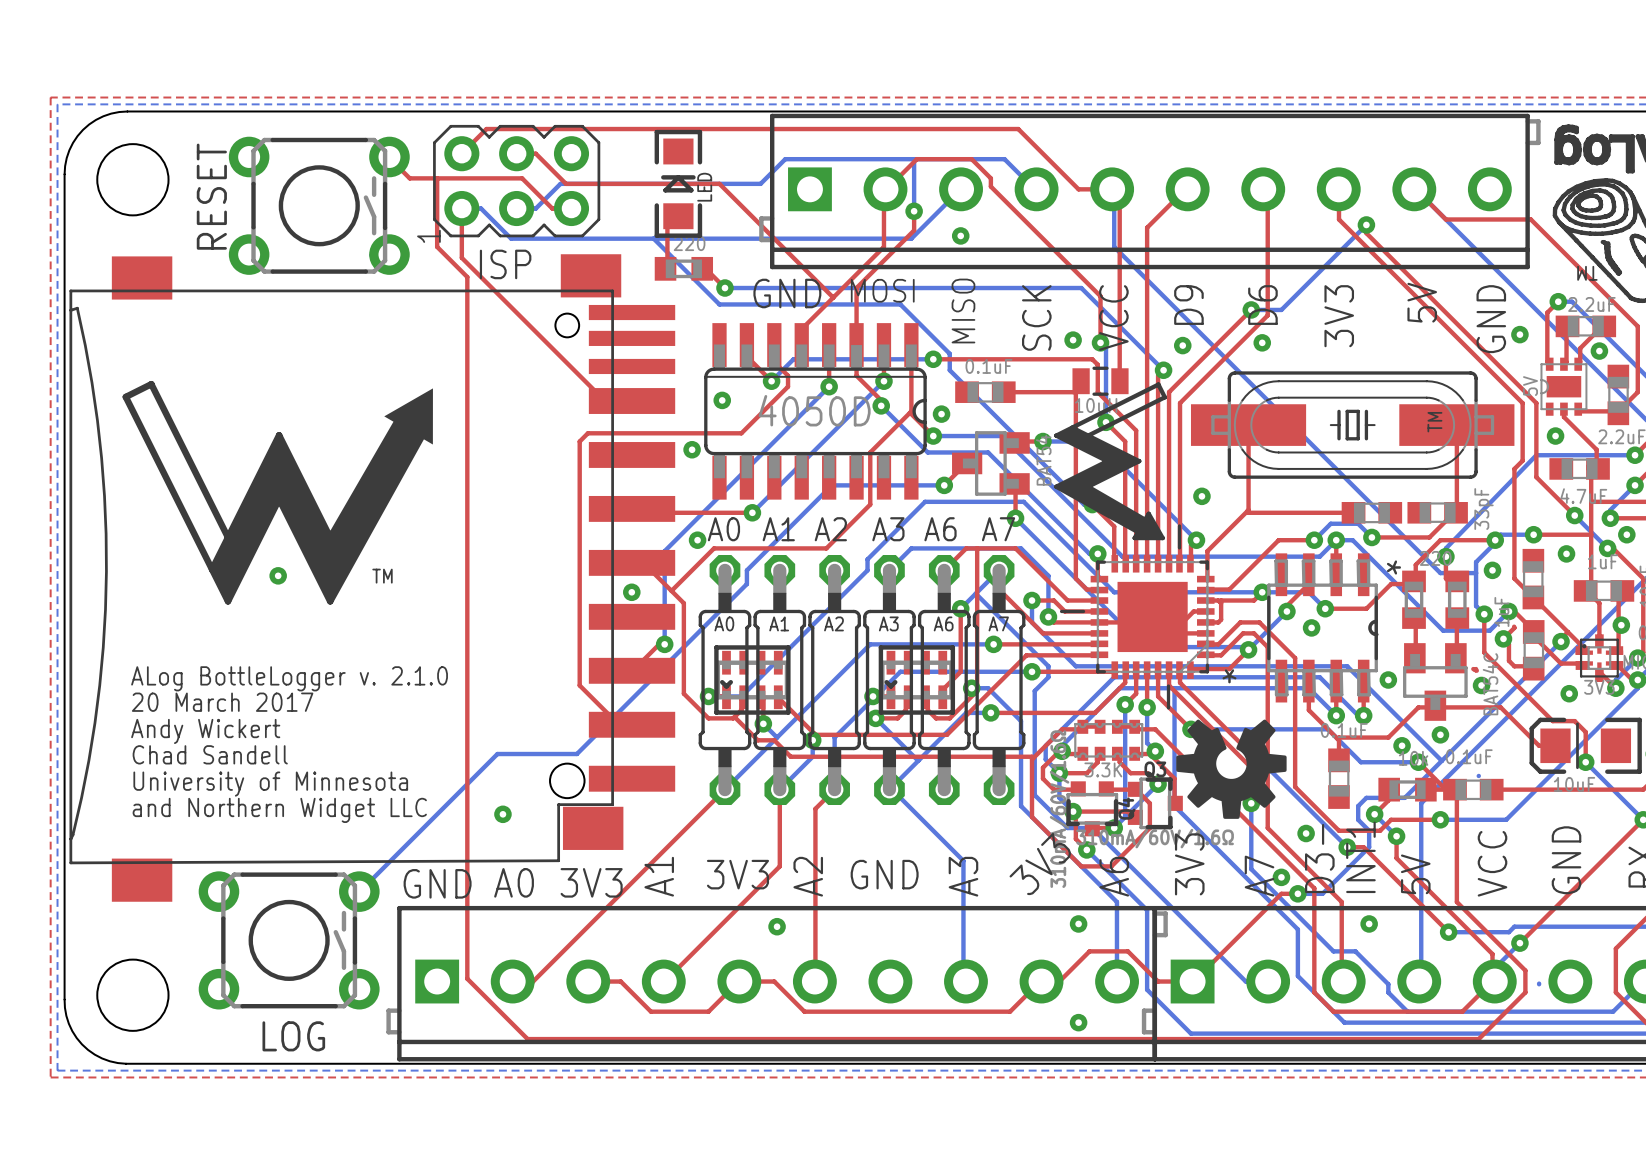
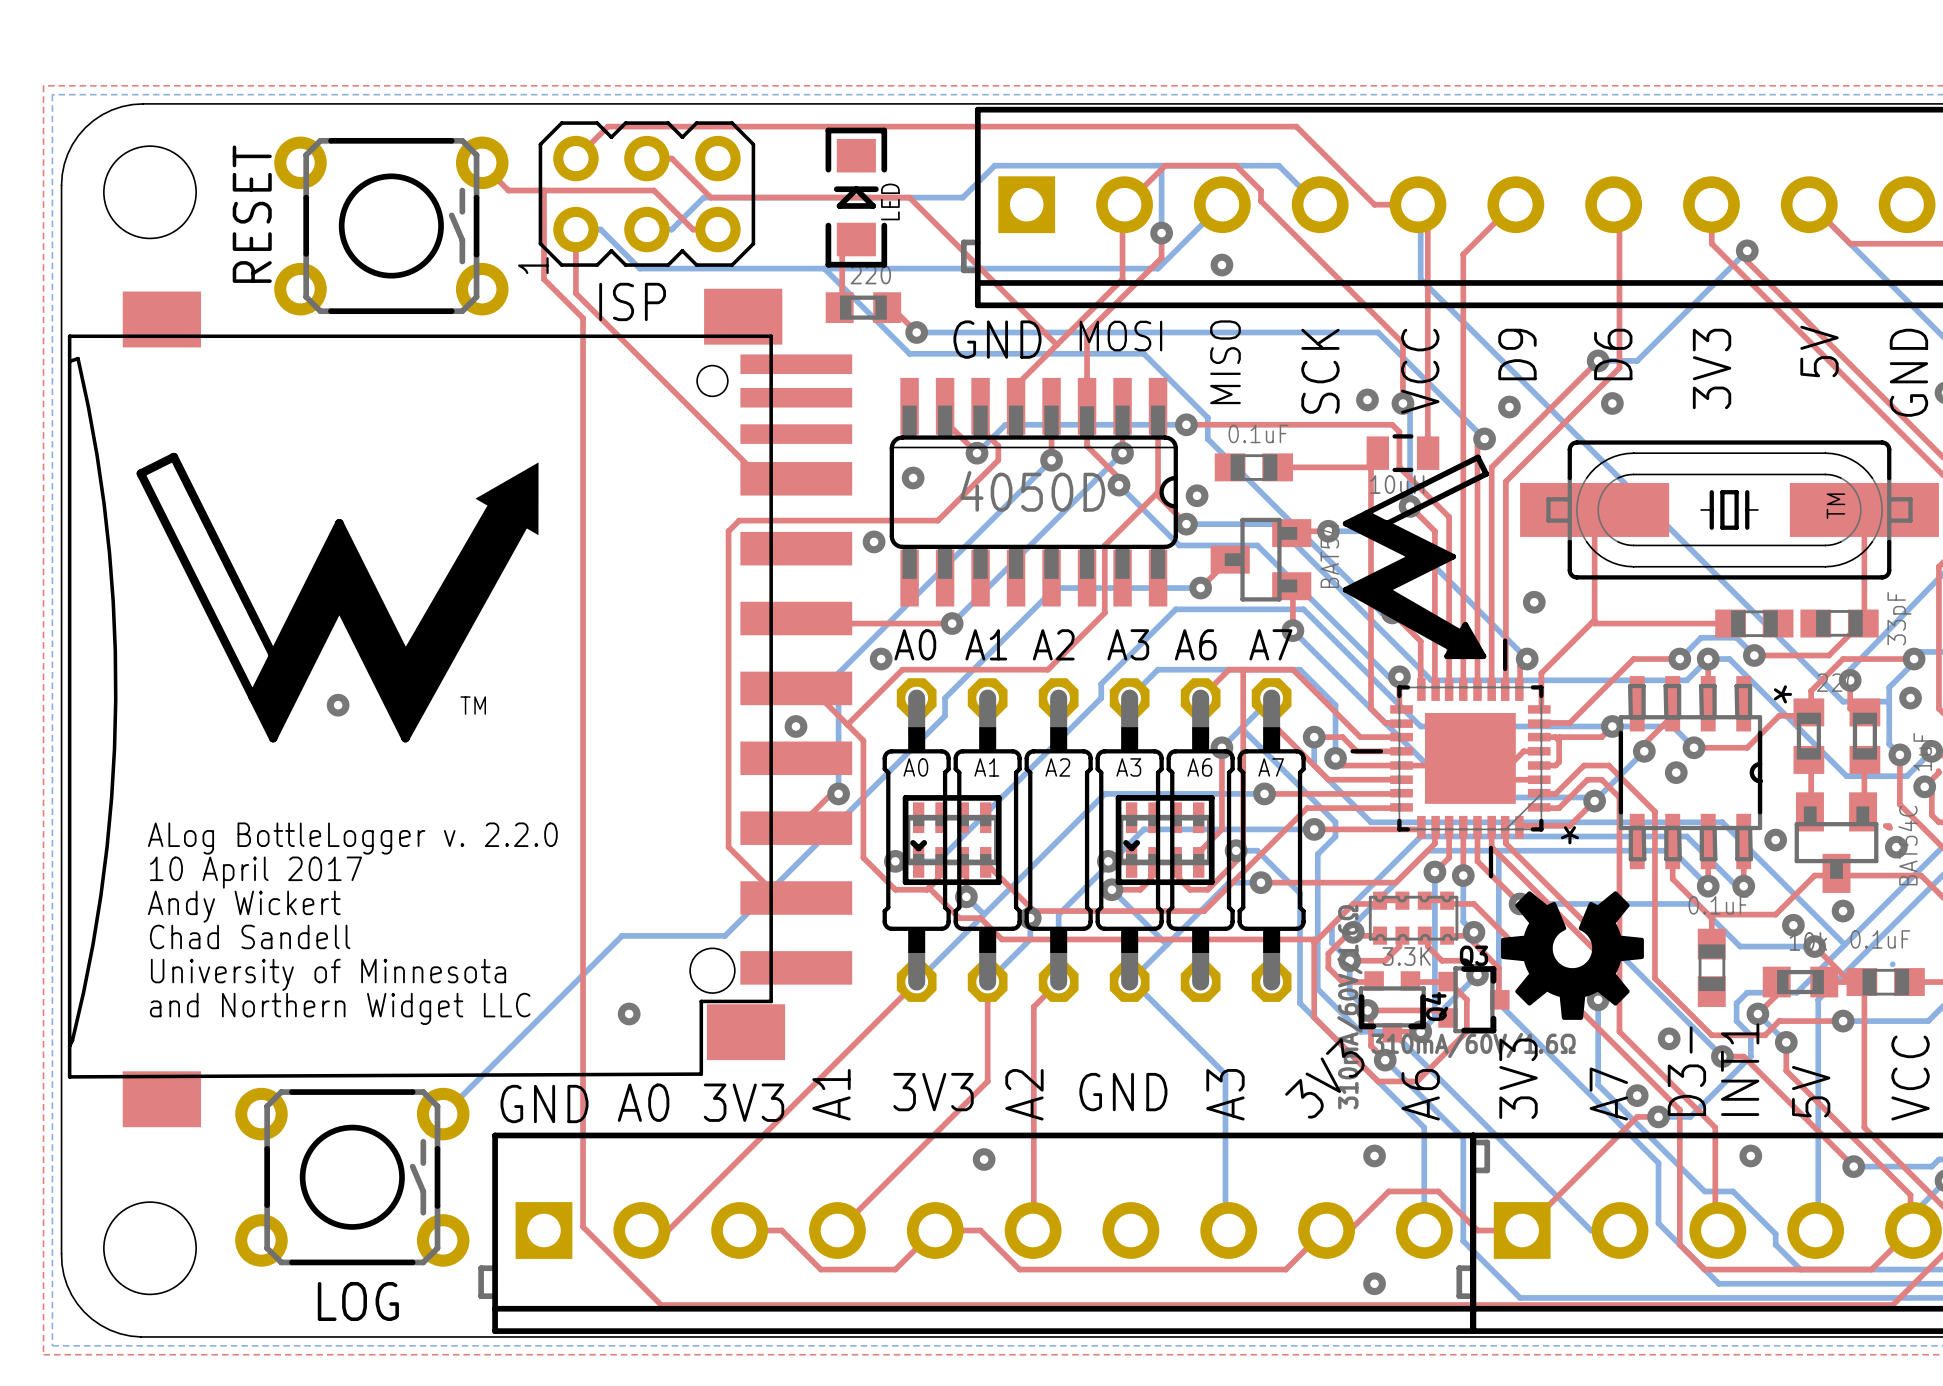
text: ALog BottleLogger v. 2.1.0 (289, 678) -> ALog BottleLogger v. 2.2.0 (352, 838)
text: 20 March 2017 (222, 702) -> 10 April 2017 (255, 872)

